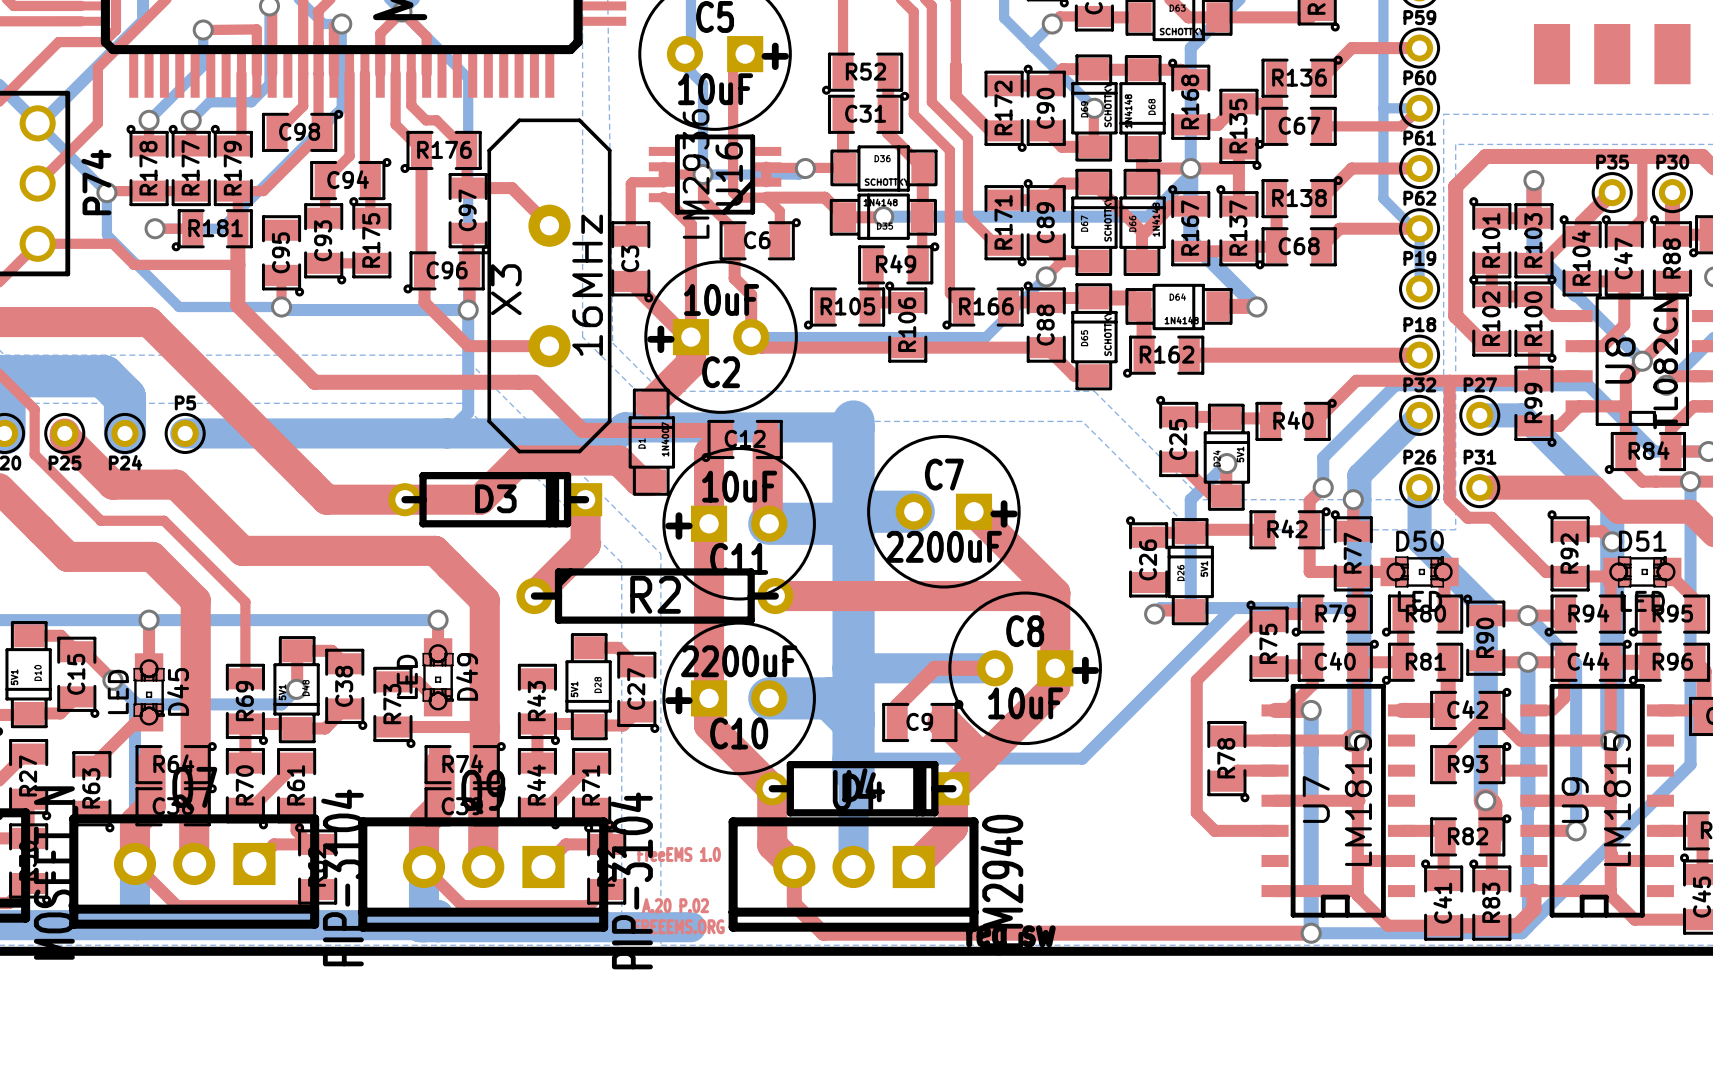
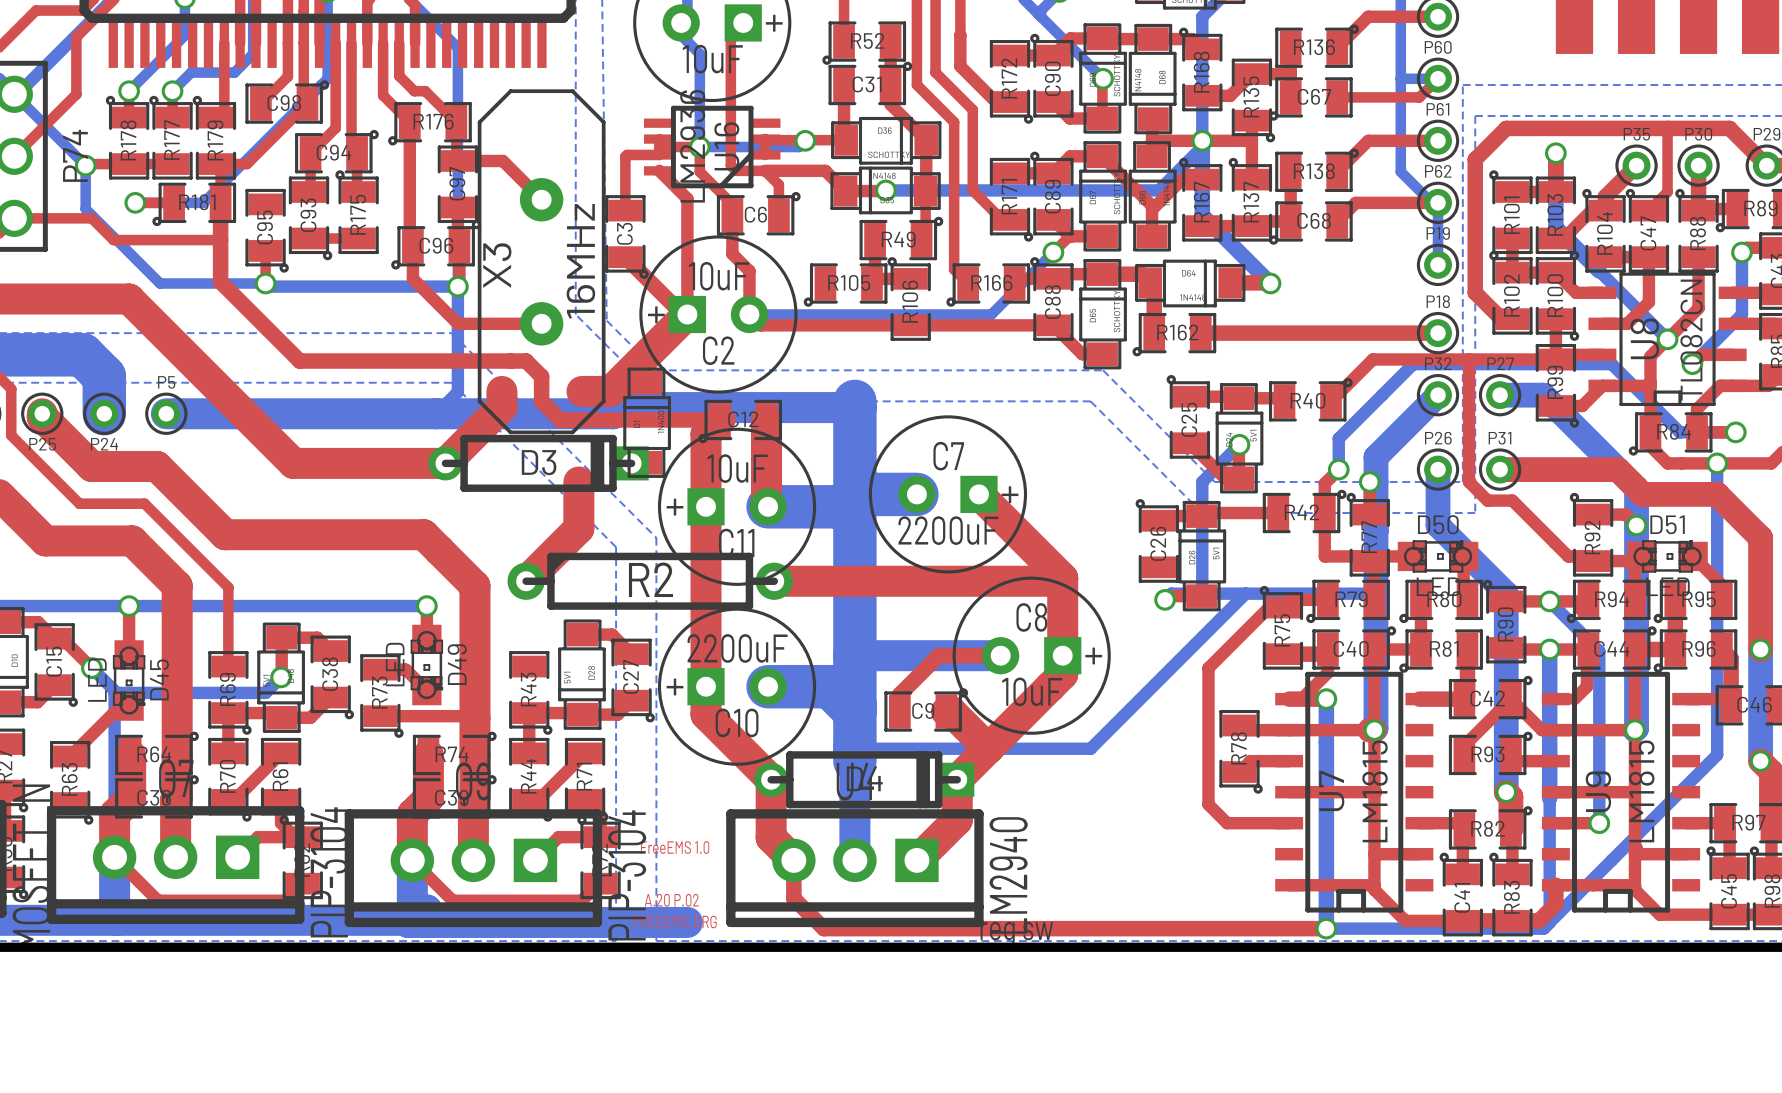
top track: (690, 337) (690, 363) (651, 403) -> (687, 314) (610, 391) (581, 391)
top track: (549, 397) (582, 430) (715, 430) (722, 439) -> (541, 376) (541, 401) (560, 419) (719, 419)
top track: (651, 481) (639, 481) (618, 460) (519, 460) (480, 499) (326, 499) (308, 481) -> (501, 391) (501, 406) (445, 463) (293, 463)
D3 position: (495, 499) -> (538, 463)

